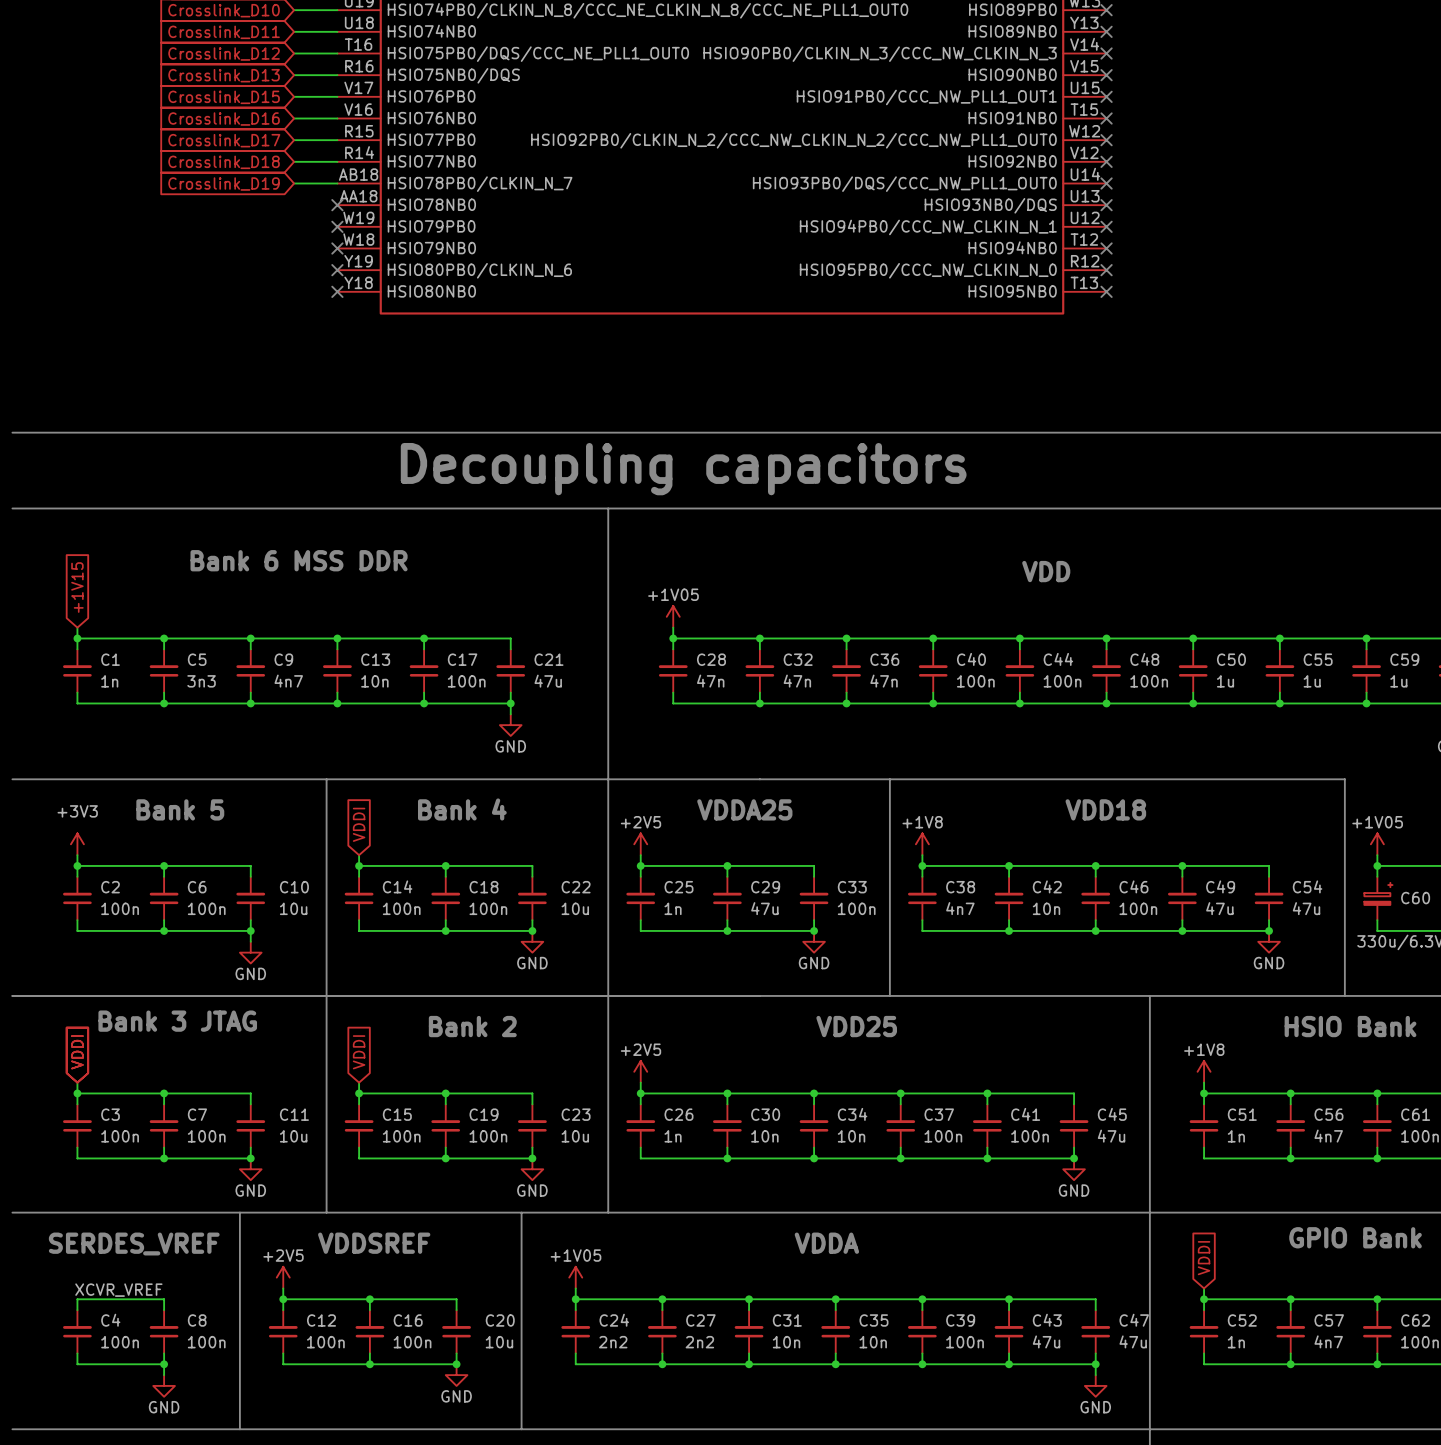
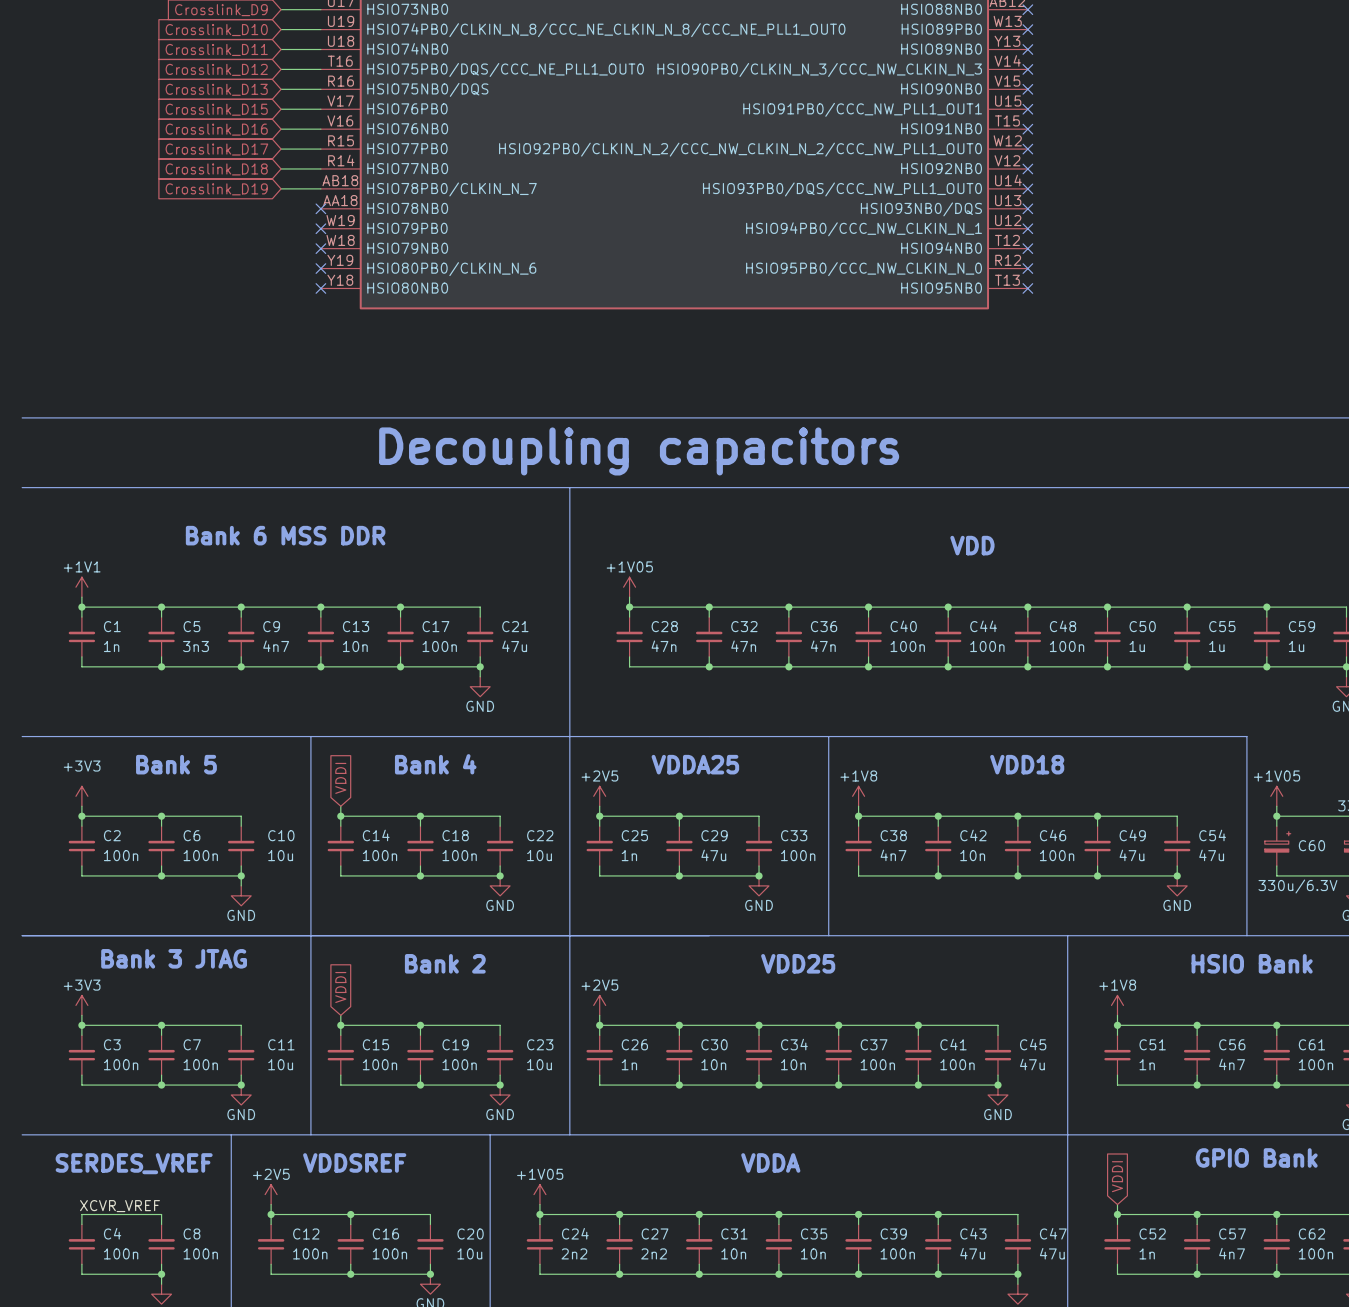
global label: +1V15 (77, 587) -> none
power symbol: none -> +1V1 (81, 587)
global label: VDDI (77, 1052) -> none
power symbol: none -> +3V3 (81, 1005)

